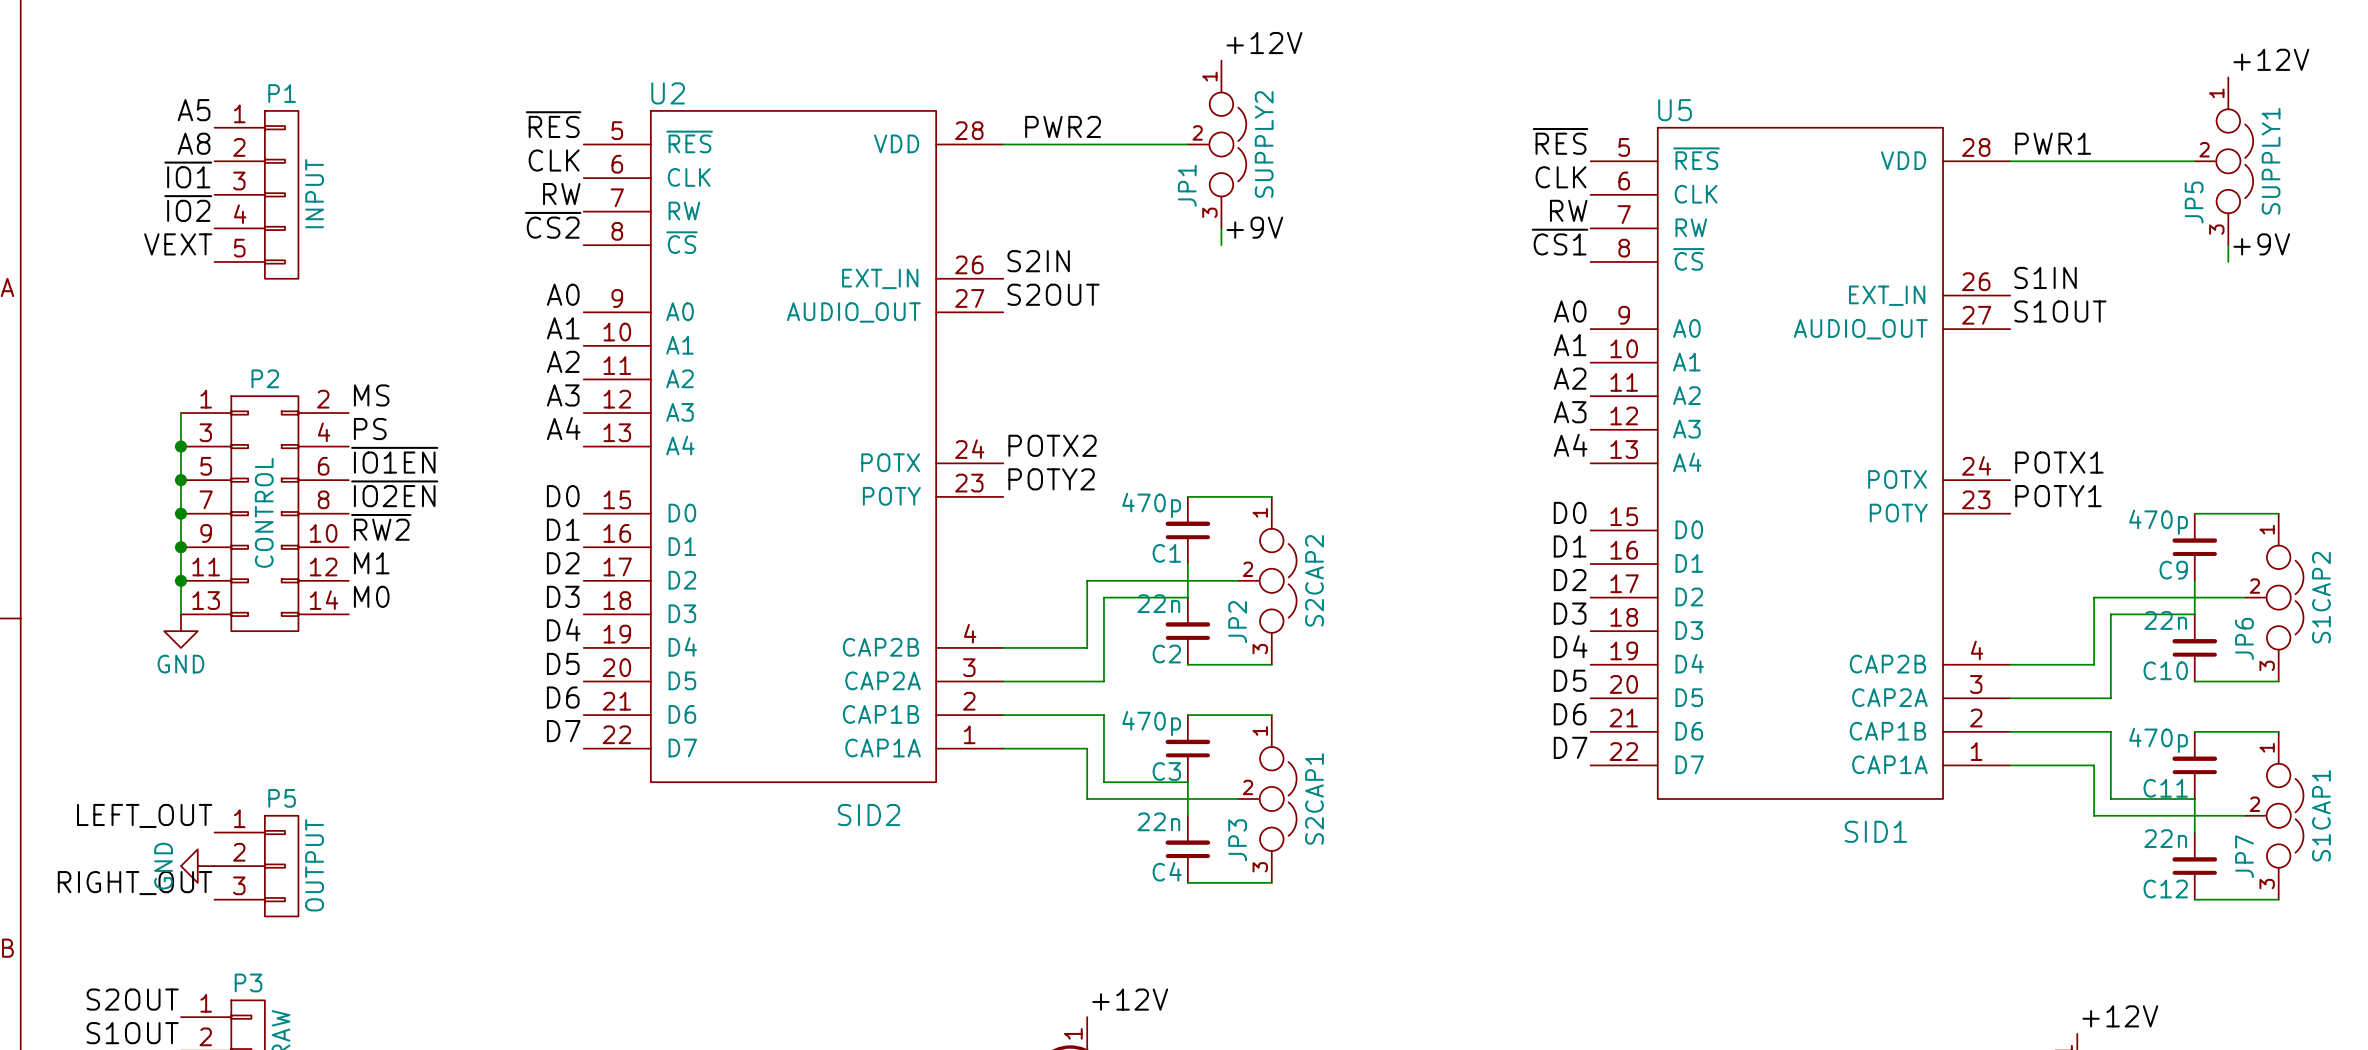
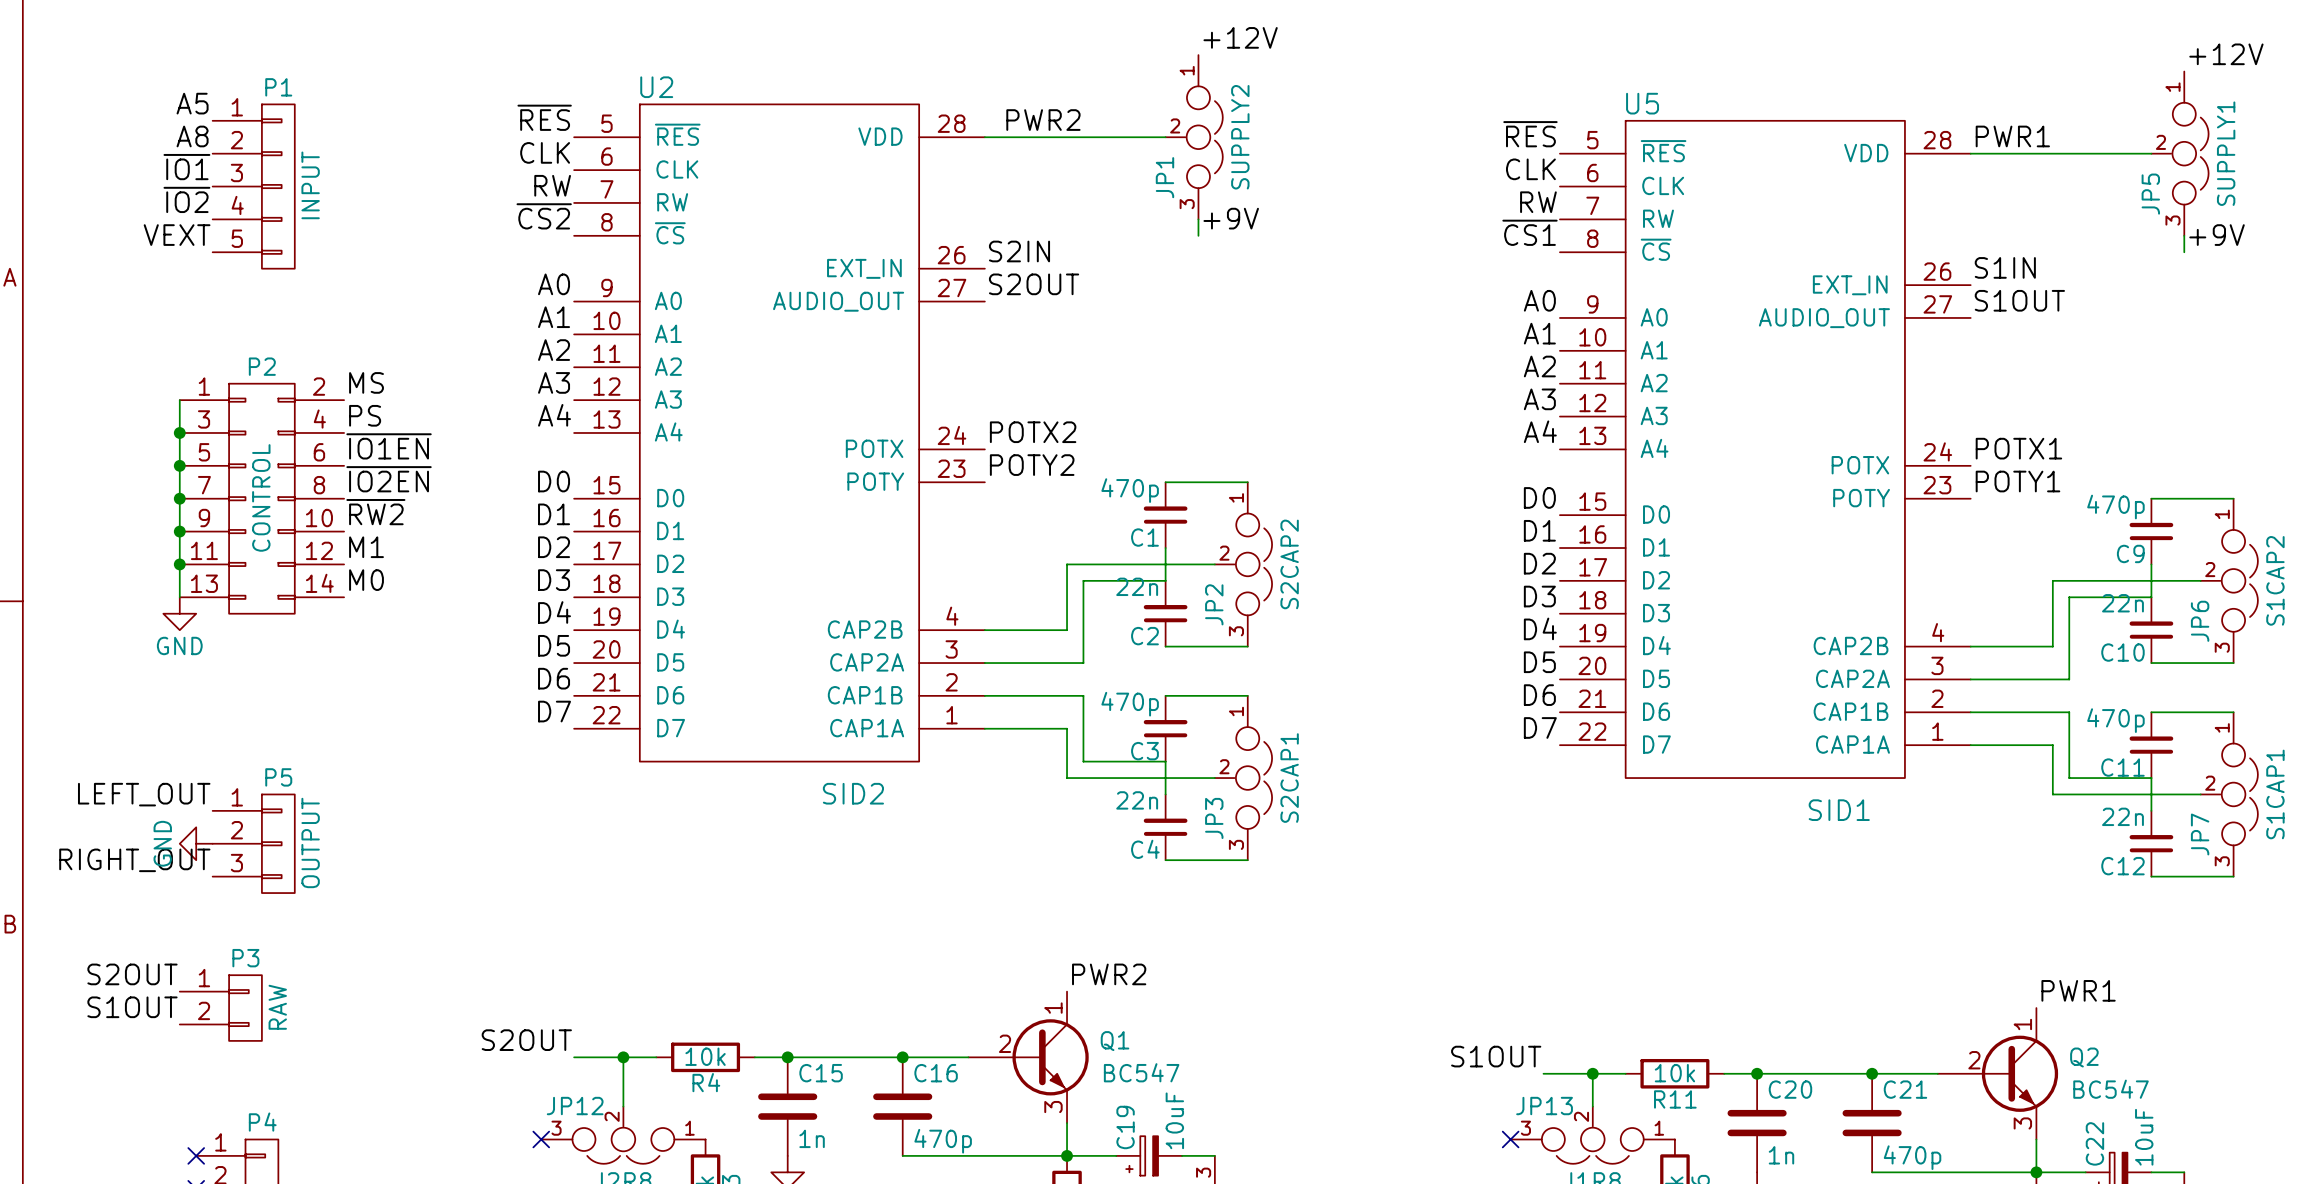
label: +12V (1130, 999) -> PWR2 (1109, 974)
label: +12V (2120, 1016) -> PWR1 (2078, 990)

